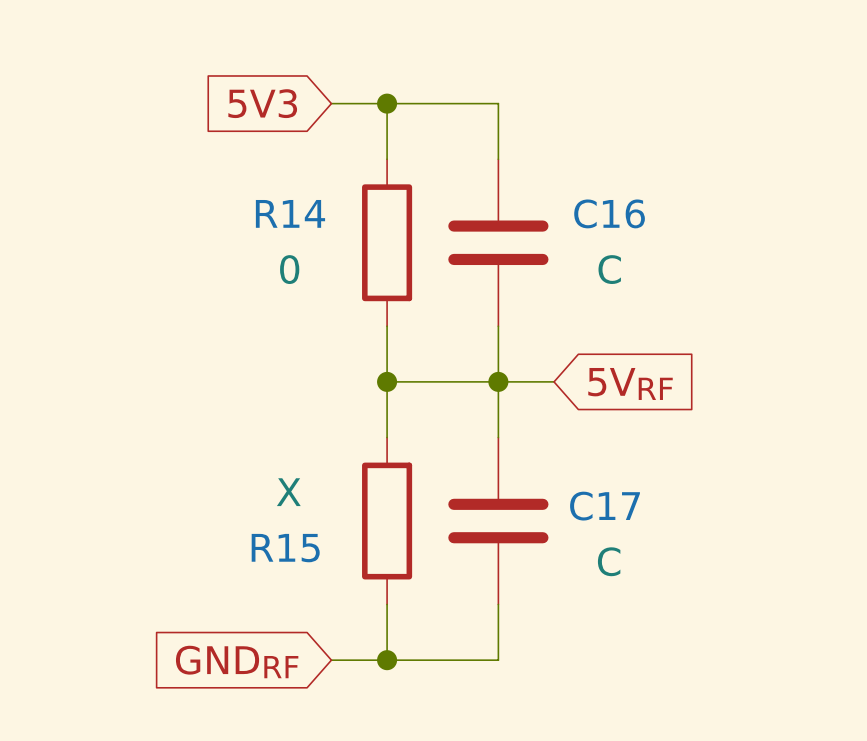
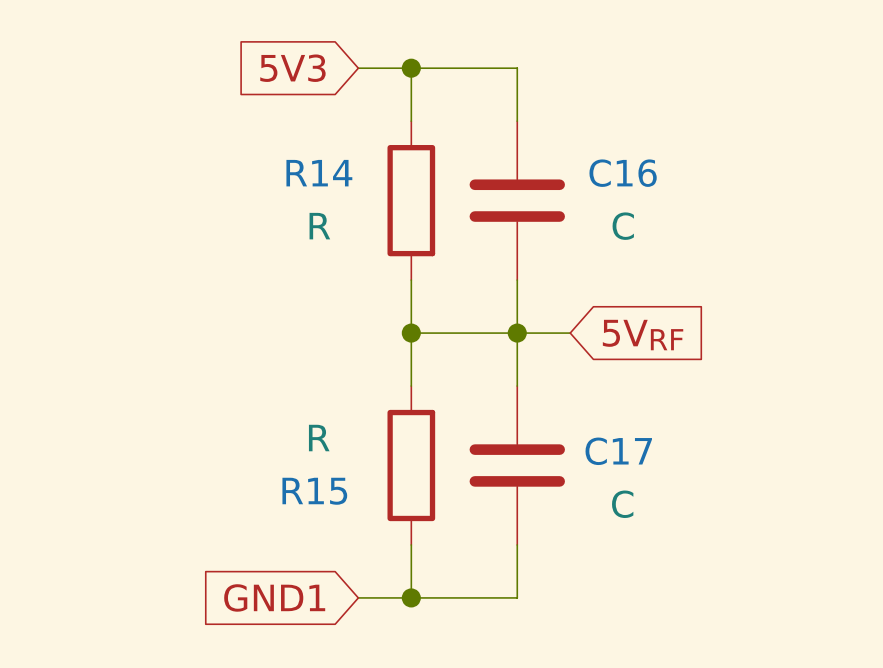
R14 value: 0 (289, 269) -> R (319, 226)
R15 value: X (288, 492) -> R (319, 438)
global label: GNDRF (237, 662) -> GND1 (274, 597)

